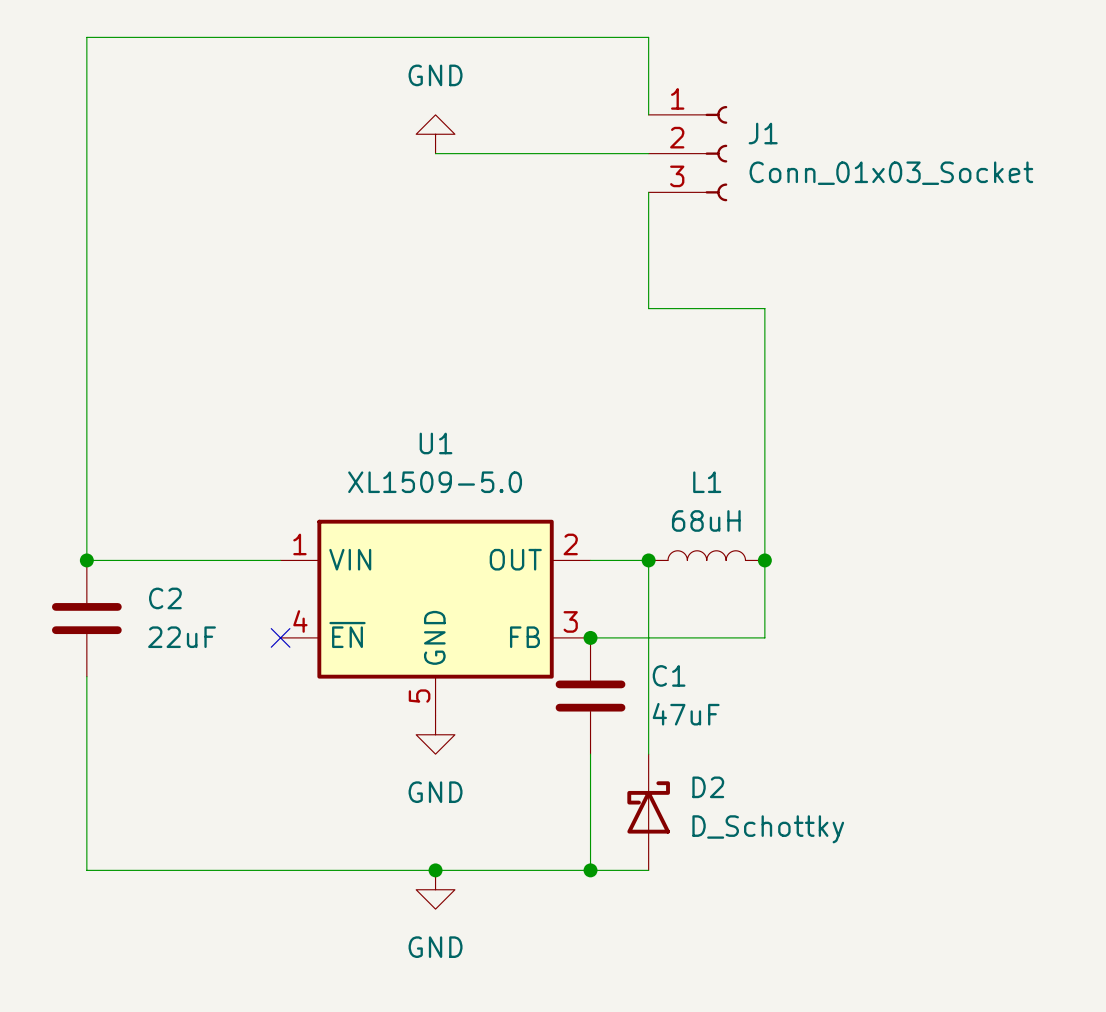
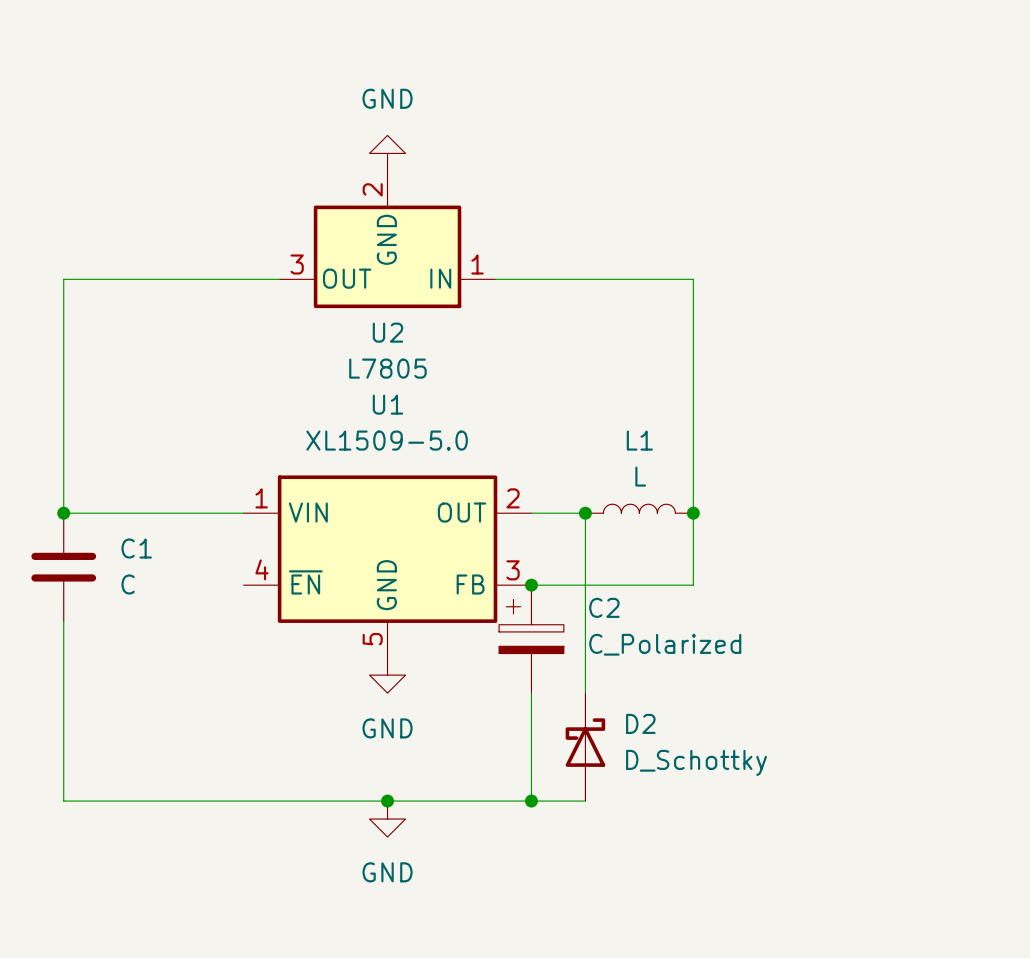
wire: (648, 114) (648, 37) (86, 37) (86, 308) -> (279, 279) (63, 279)
power symbol position: GND (435, 134) -> GND (387, 153)
wire: (435, 153) (648, 153) -> none
J1: Conn_01x03_Socket (687, 153) -> none
wire: (648, 192) (648, 308) -> (495, 279) (585, 279)
U2: none -> L7805 (387, 239)
L1 value: 68uH (706, 520) -> L (640, 476)
C2 name: C2 (165, 598) -> C1 (136, 548)
C2 value: 22uF (182, 637) -> C (128, 584)
no-connect mark: (280, 637) -> none
C1: 47uF (590, 696) -> none
C2: none -> C_Polarized (531, 639)

